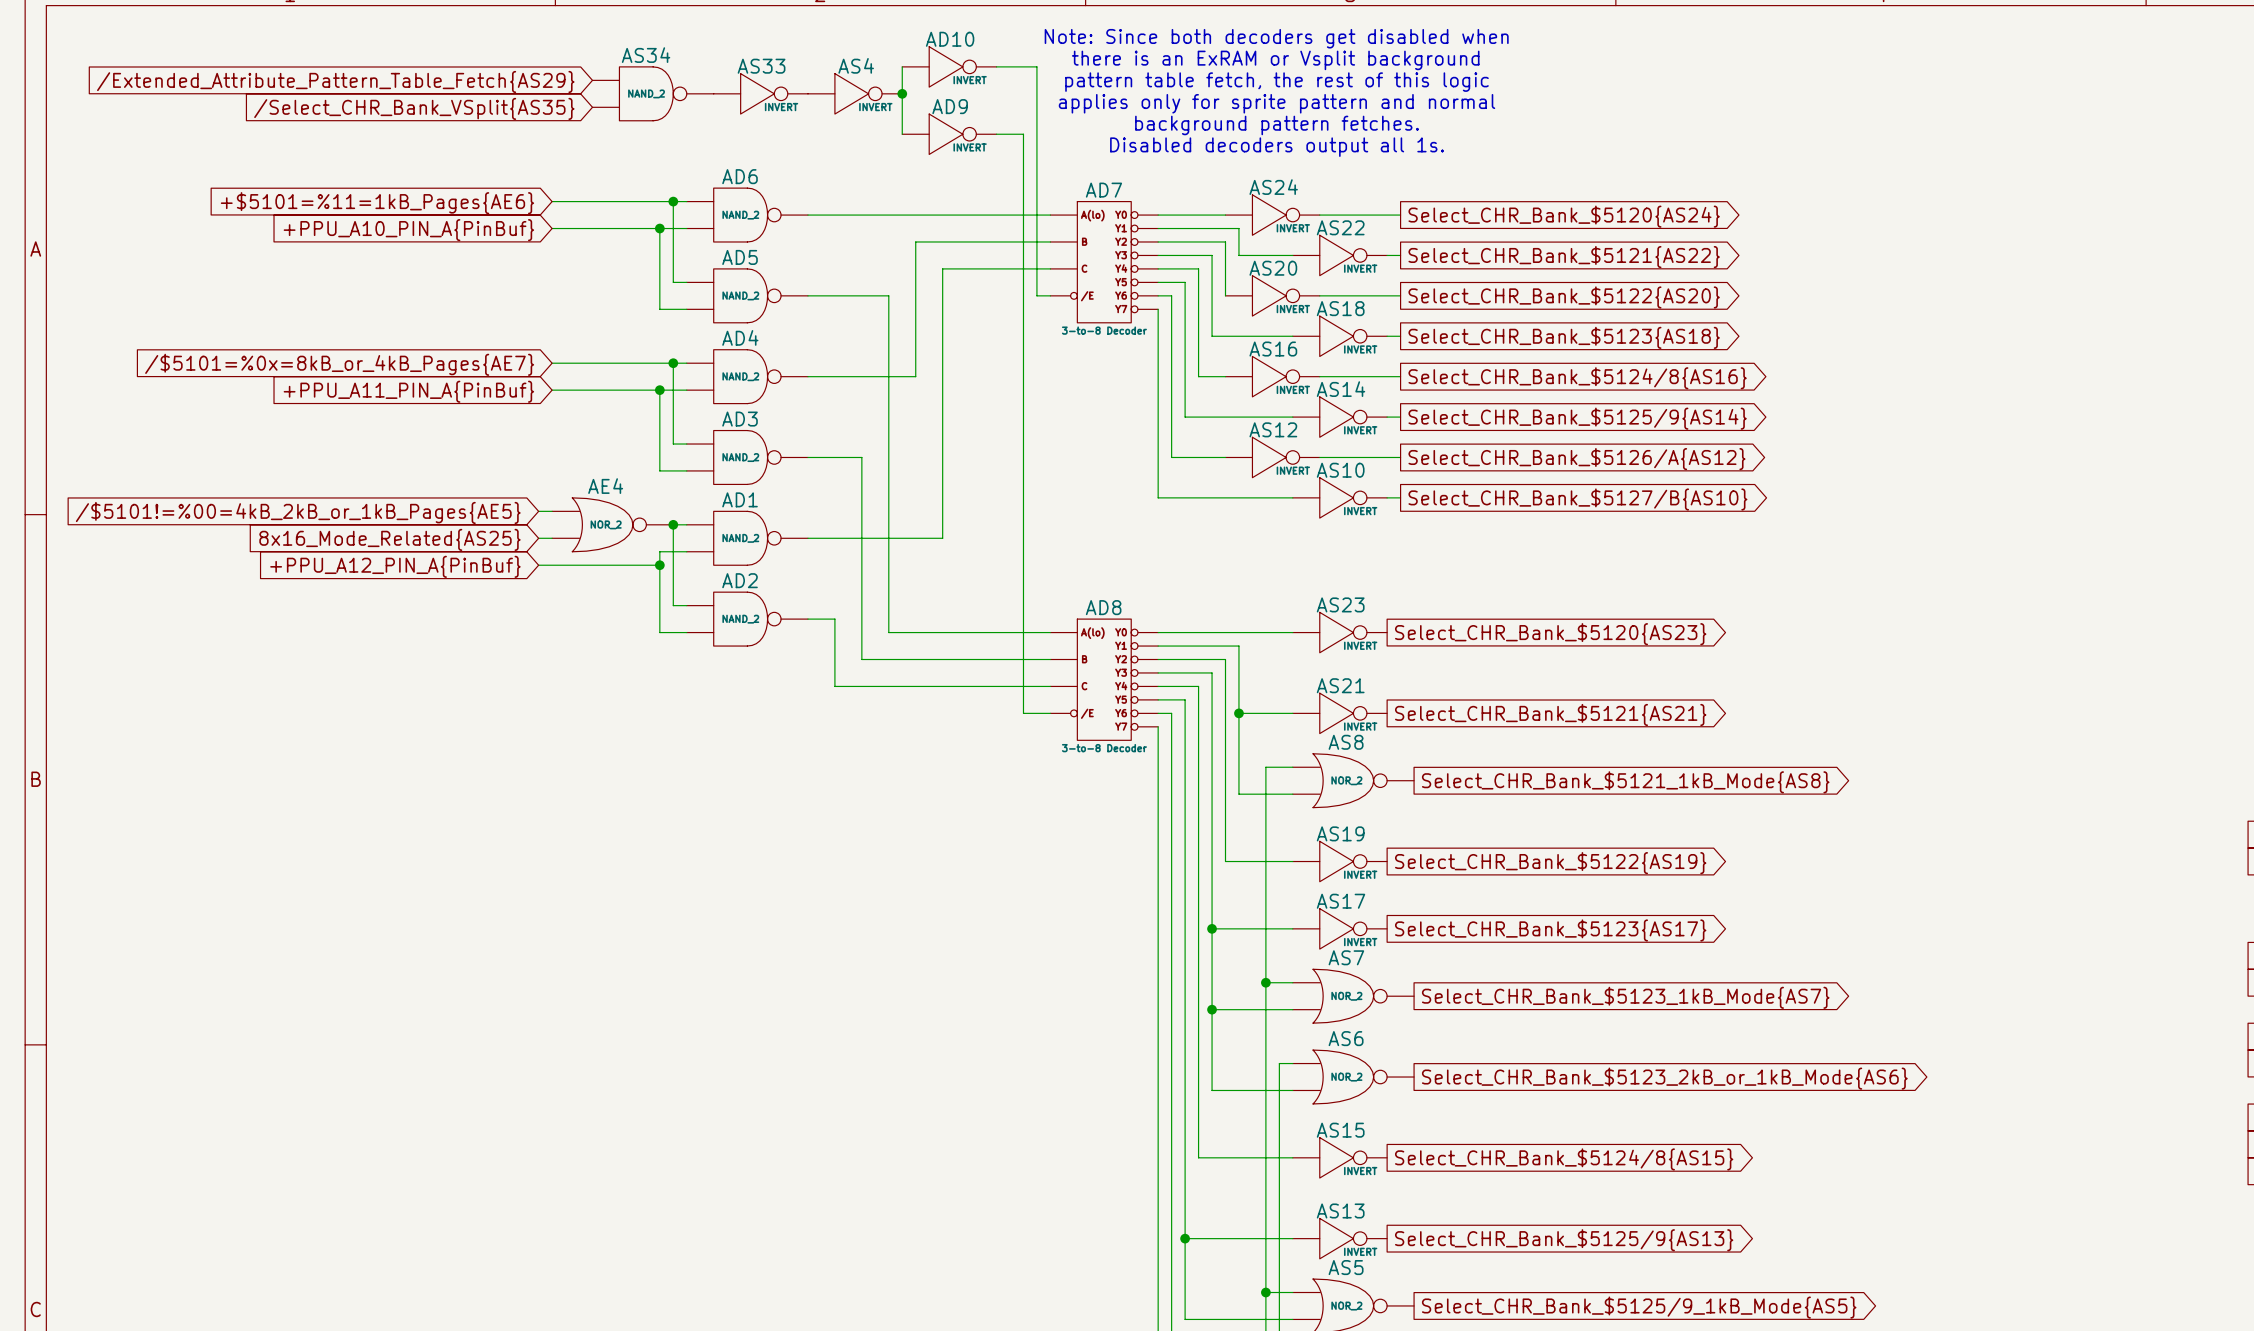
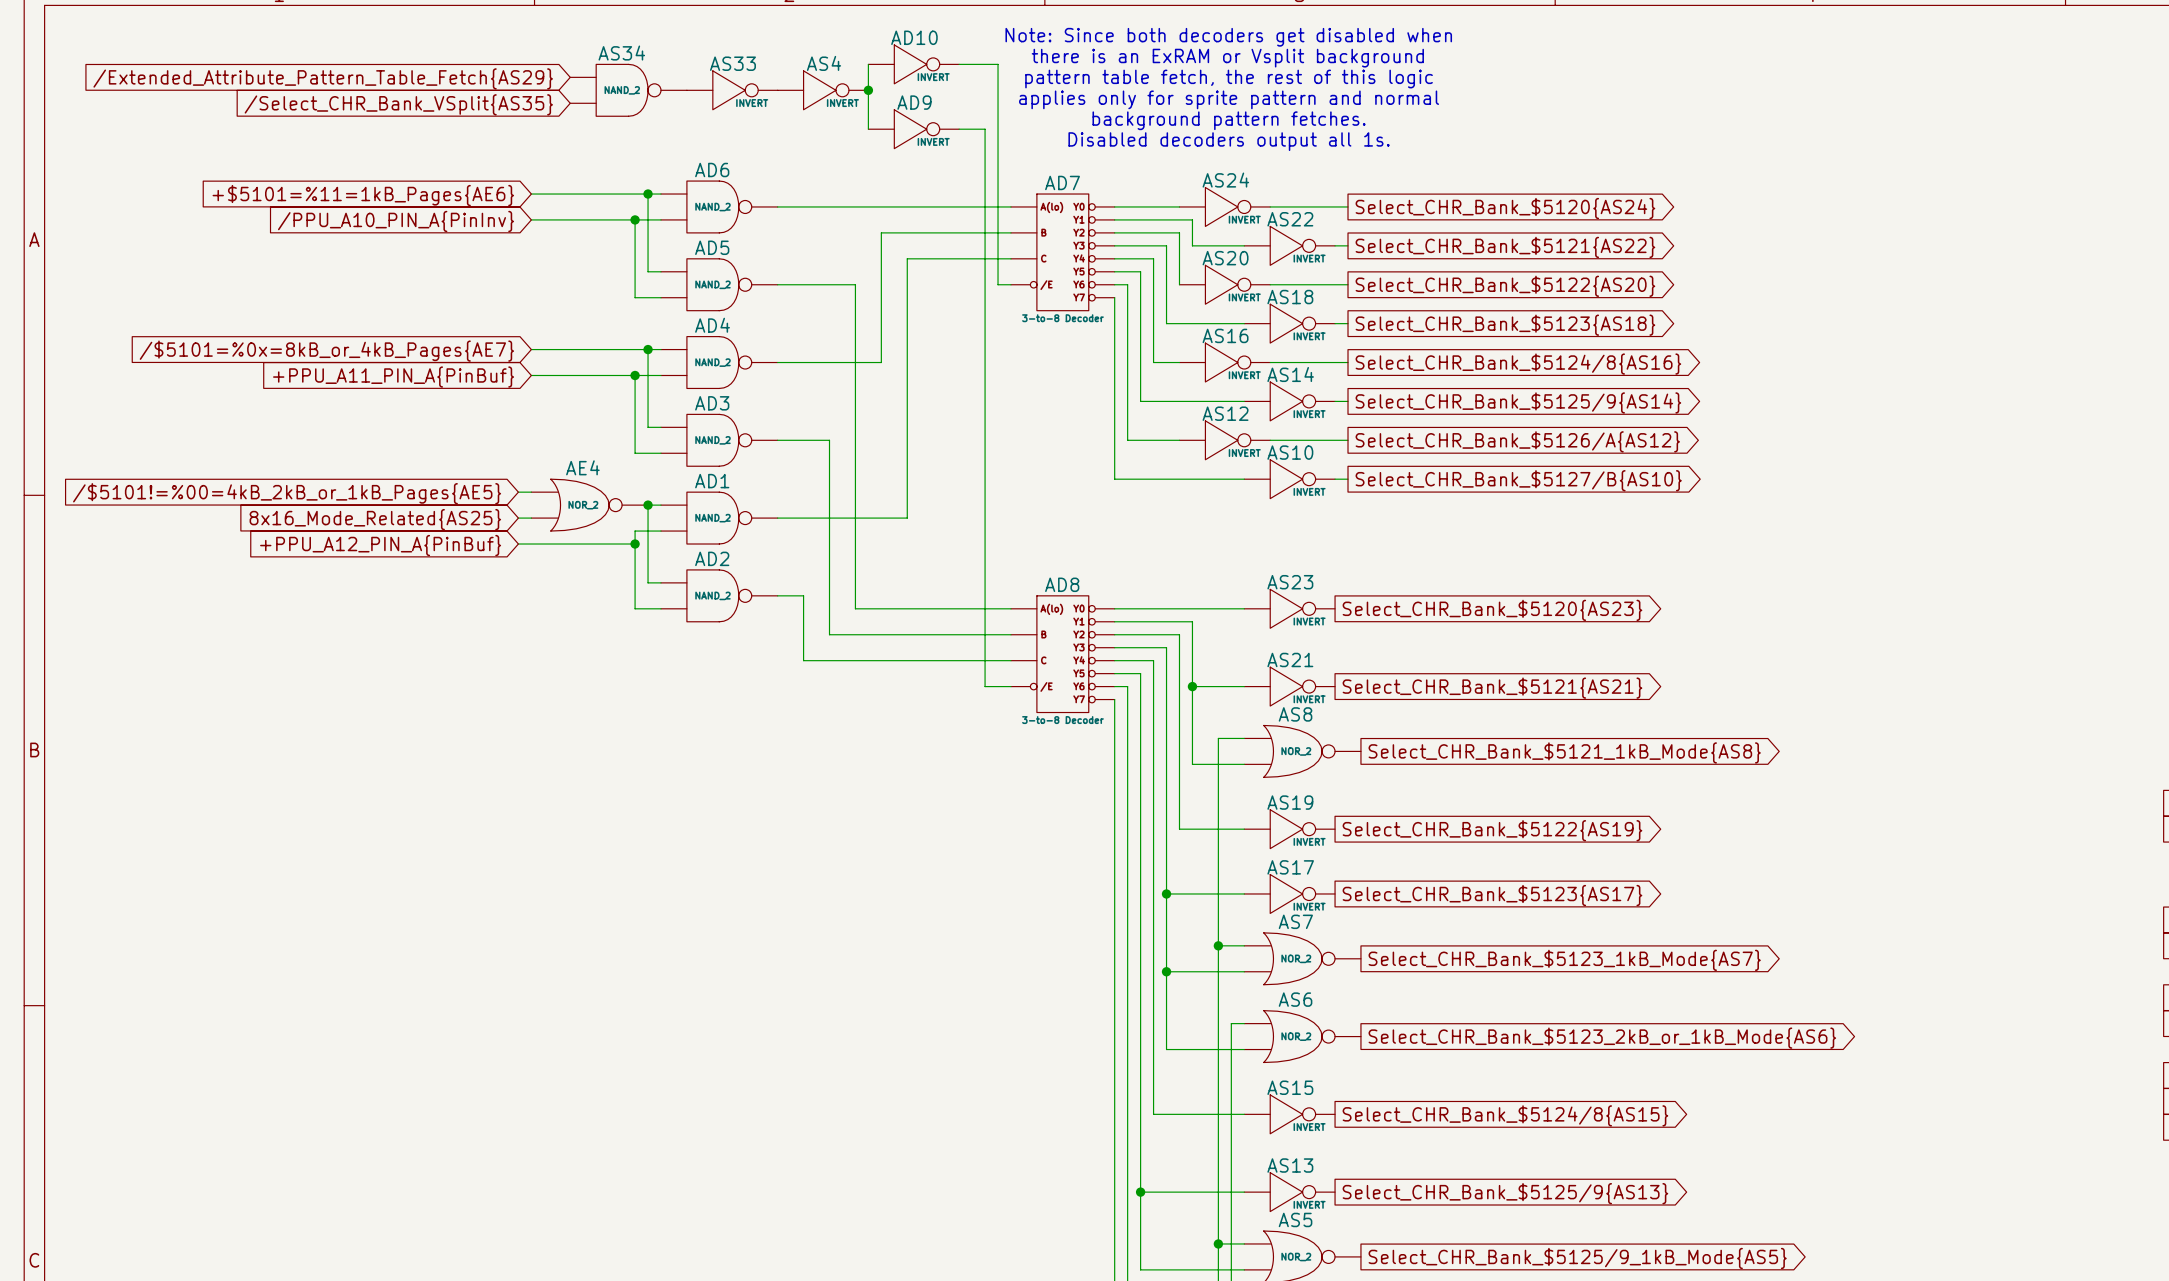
global label: +PPU_A10_PIN_A{PinBuf} (408, 230) -> /PPU_A10_PIN_A{PinInv} (396, 221)

